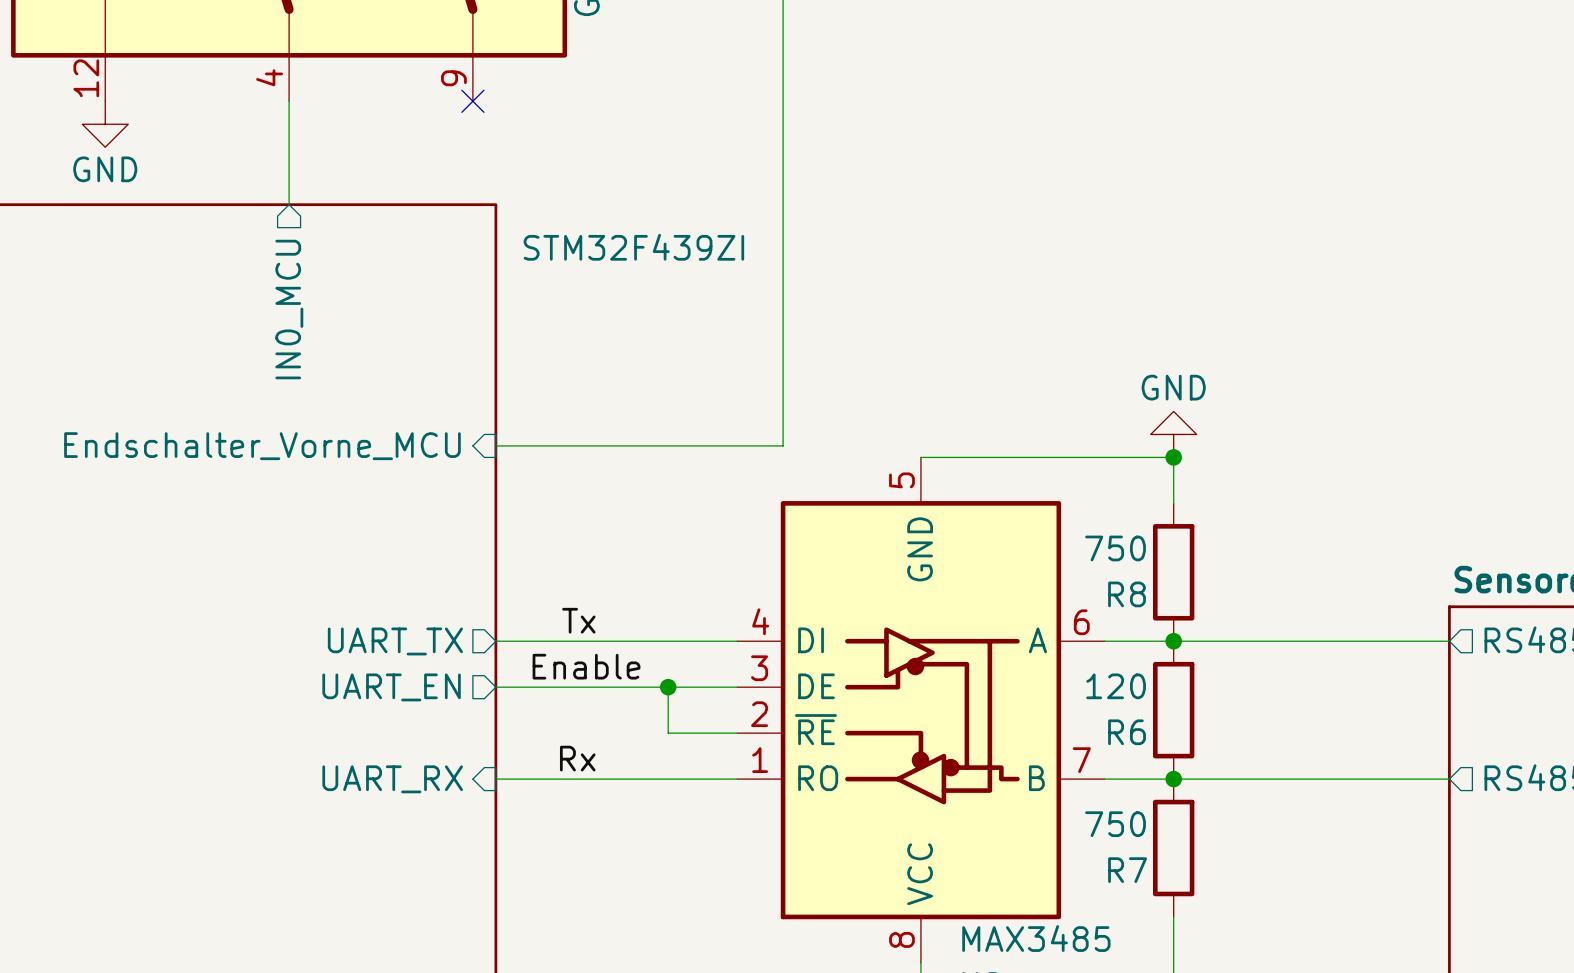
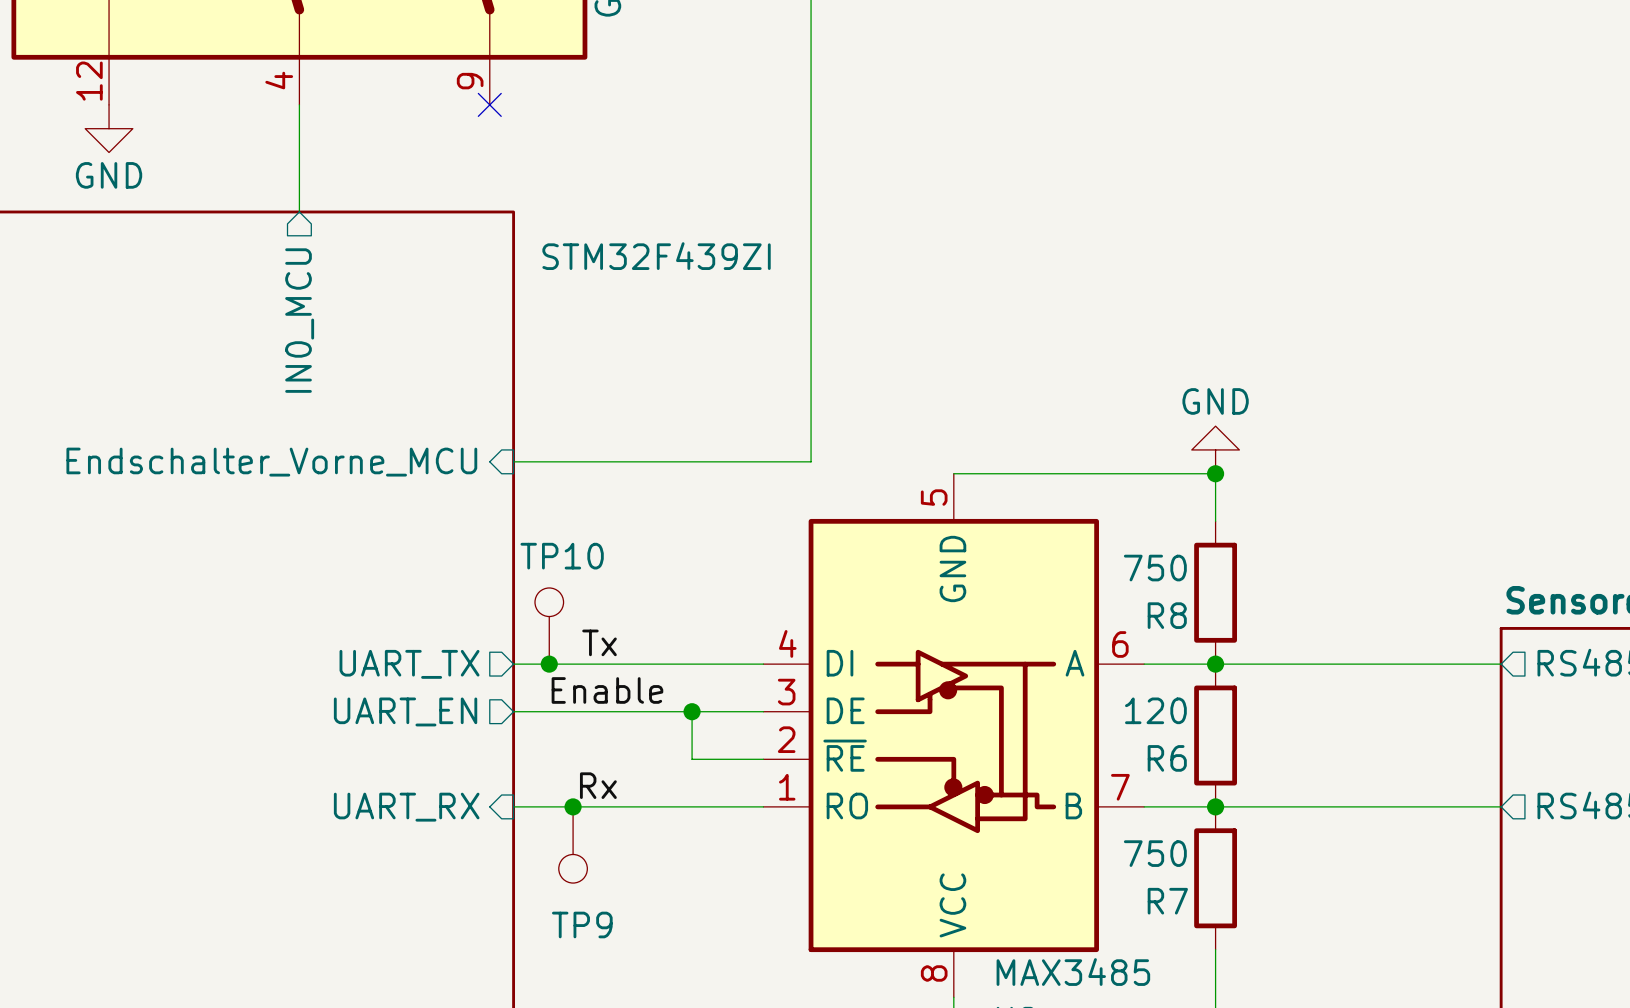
TP10: none -> (549, 626)
junction: none -> (549, 664)
junction: none -> (573, 806)
TP9: none -> (573, 844)

